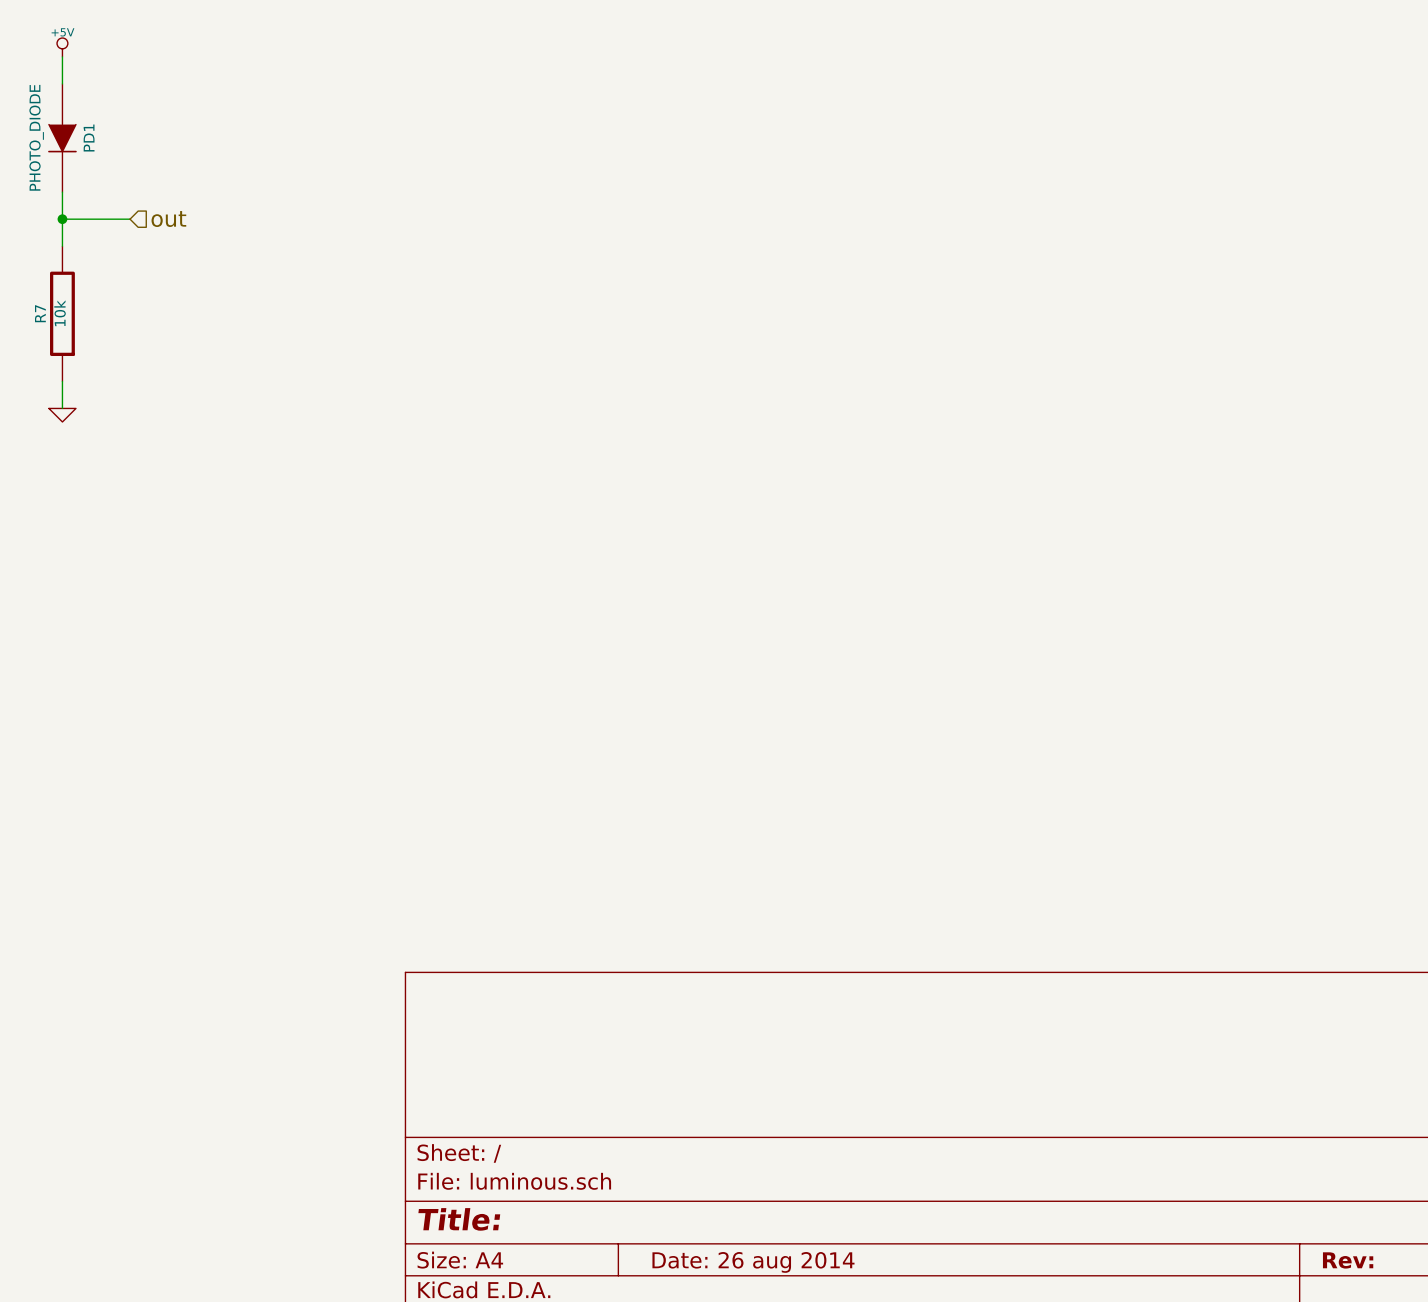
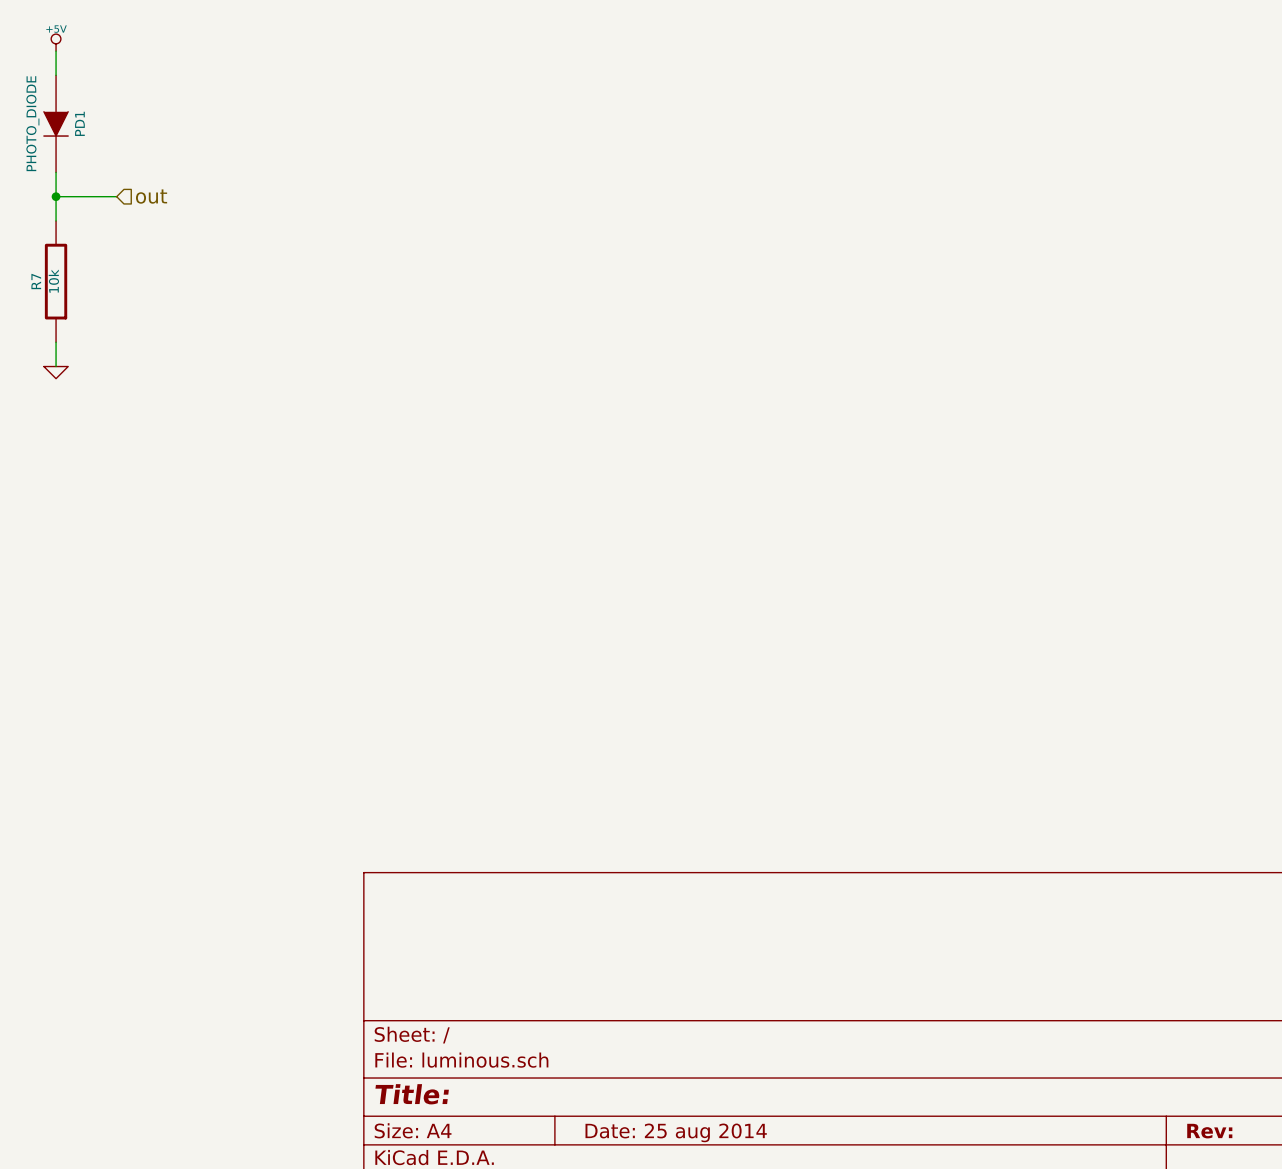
title block: Date: 26 aug 2014 (753, 1262) -> Date: 25 aug 2014 (676, 1132)

